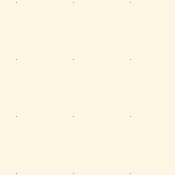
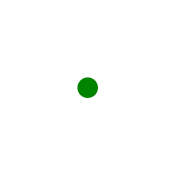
junction: none -> (87, 87)

